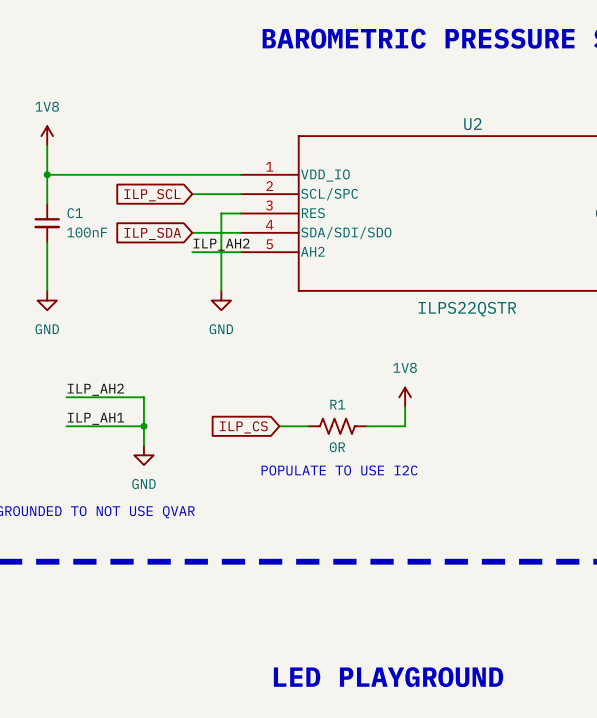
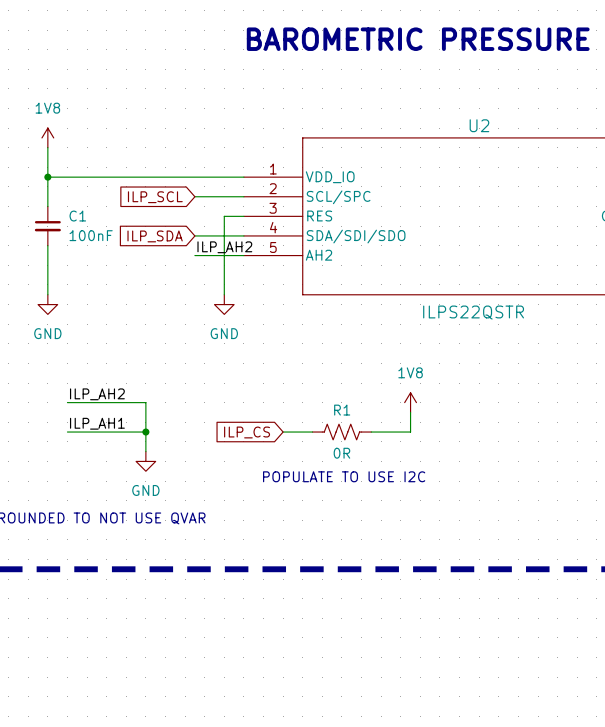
text: LED PLAYGROUND (388, 677) -> none

